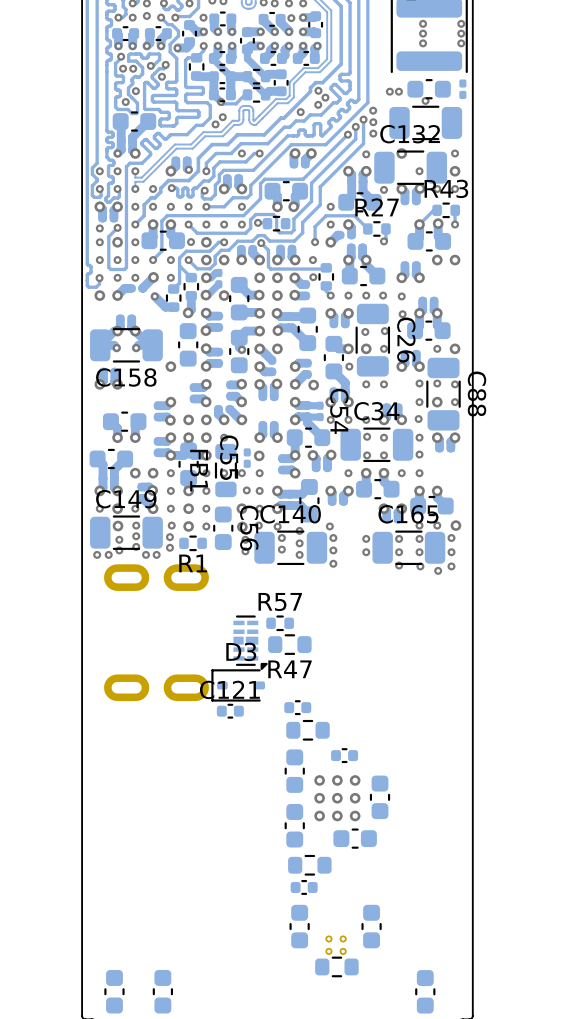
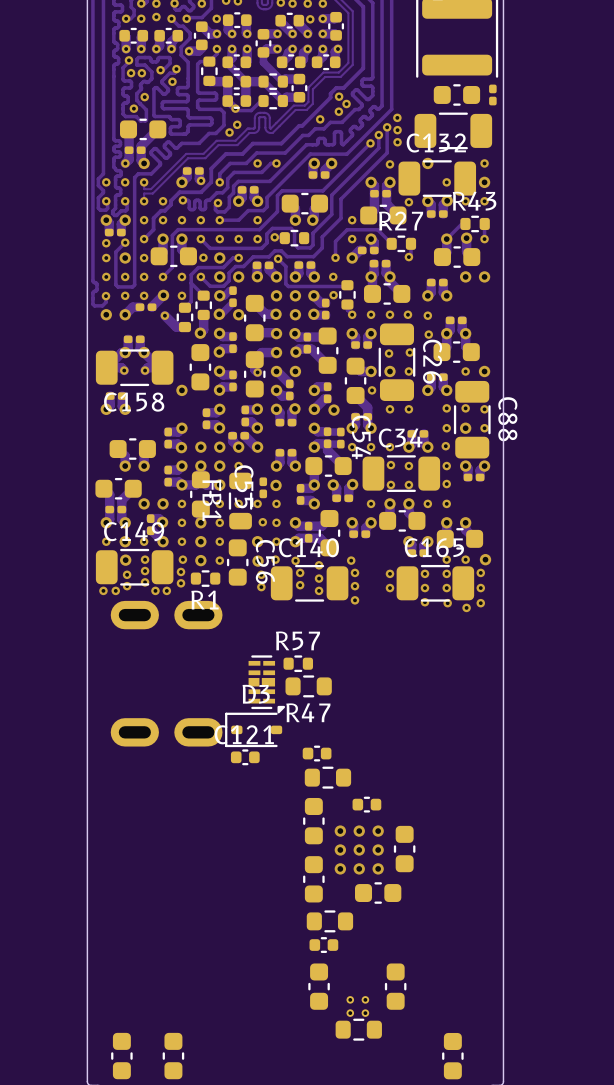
via: (423, 23) -> none
via: (461, 23) -> none
via: (423, 33) -> none
via: (461, 33) -> none
via: (423, 43) -> none
via: (461, 43) -> none
via: (389, 91) -> none
via: (398, 91) -> none
via: (425, 100) -> none

